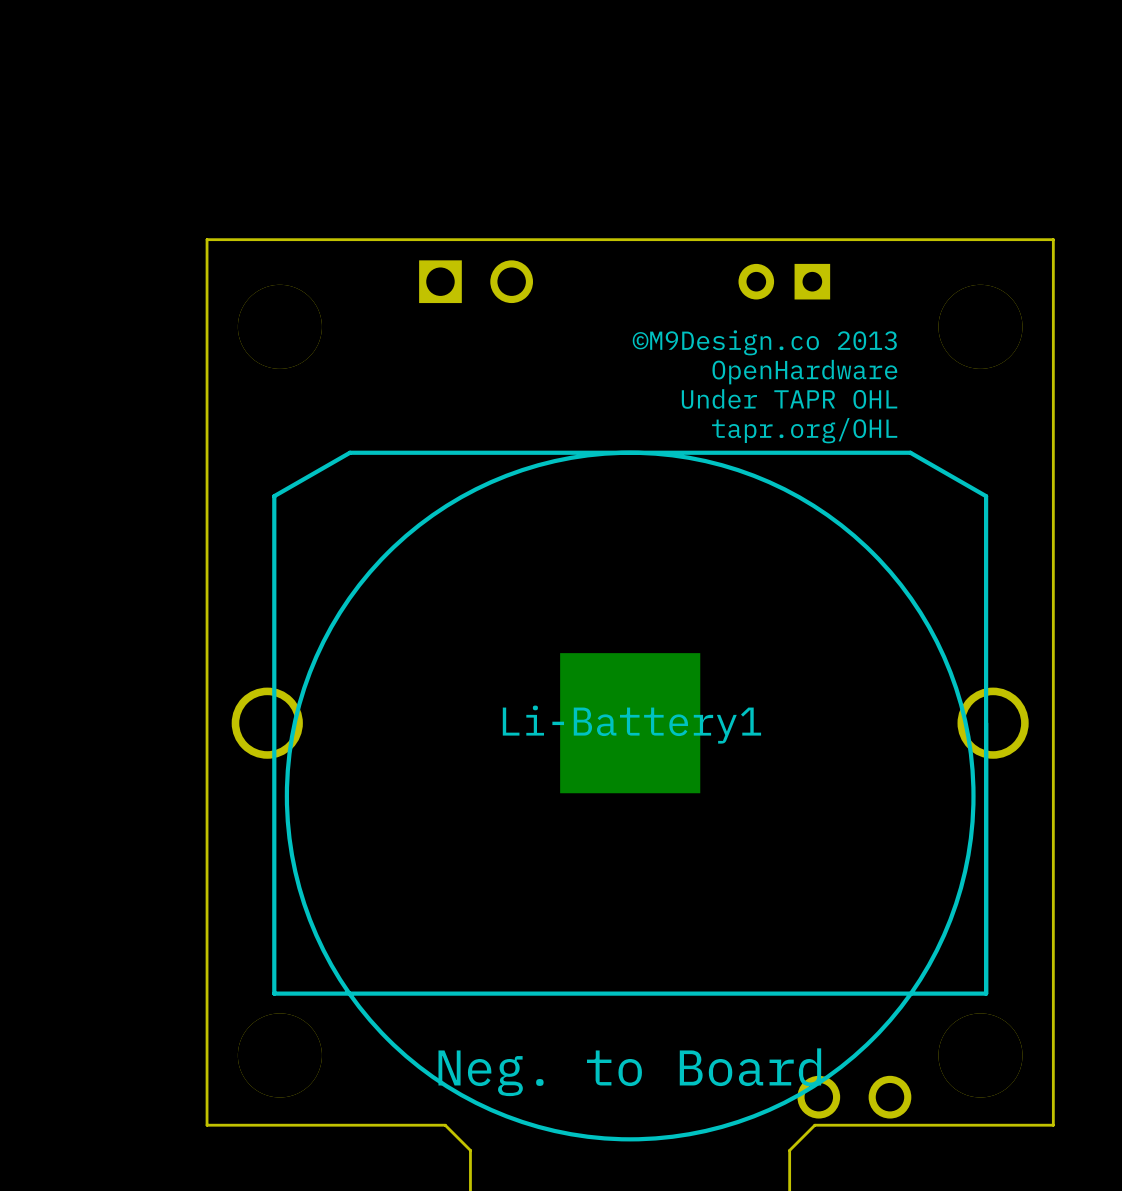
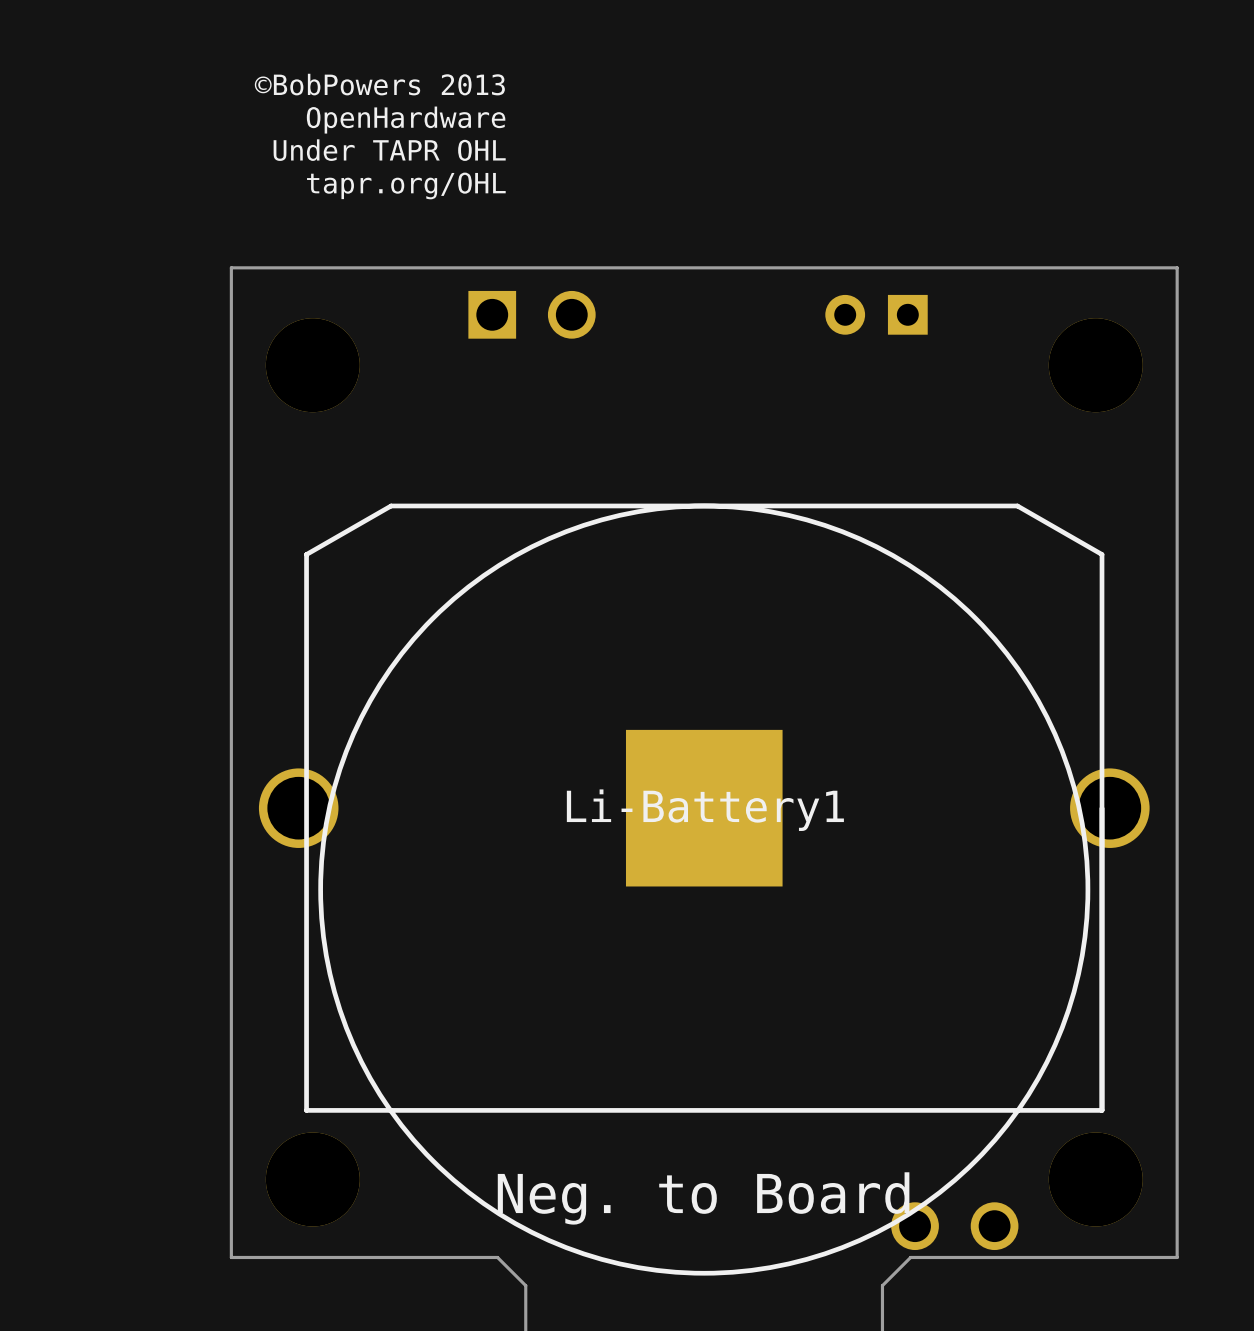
text: none -> ©BobPowers 2013 (379, 84)
text: ©M9Design.co 2013 (764, 342) -> none
text position: OpenHardware (804, 372) -> OpenHardware (406, 120)
text position: Under TAPR OHL (789, 398) -> Under TAPR OHL (389, 150)
text position: tapr.org/OHL (804, 430) -> tapr.org/OHL (406, 185)

